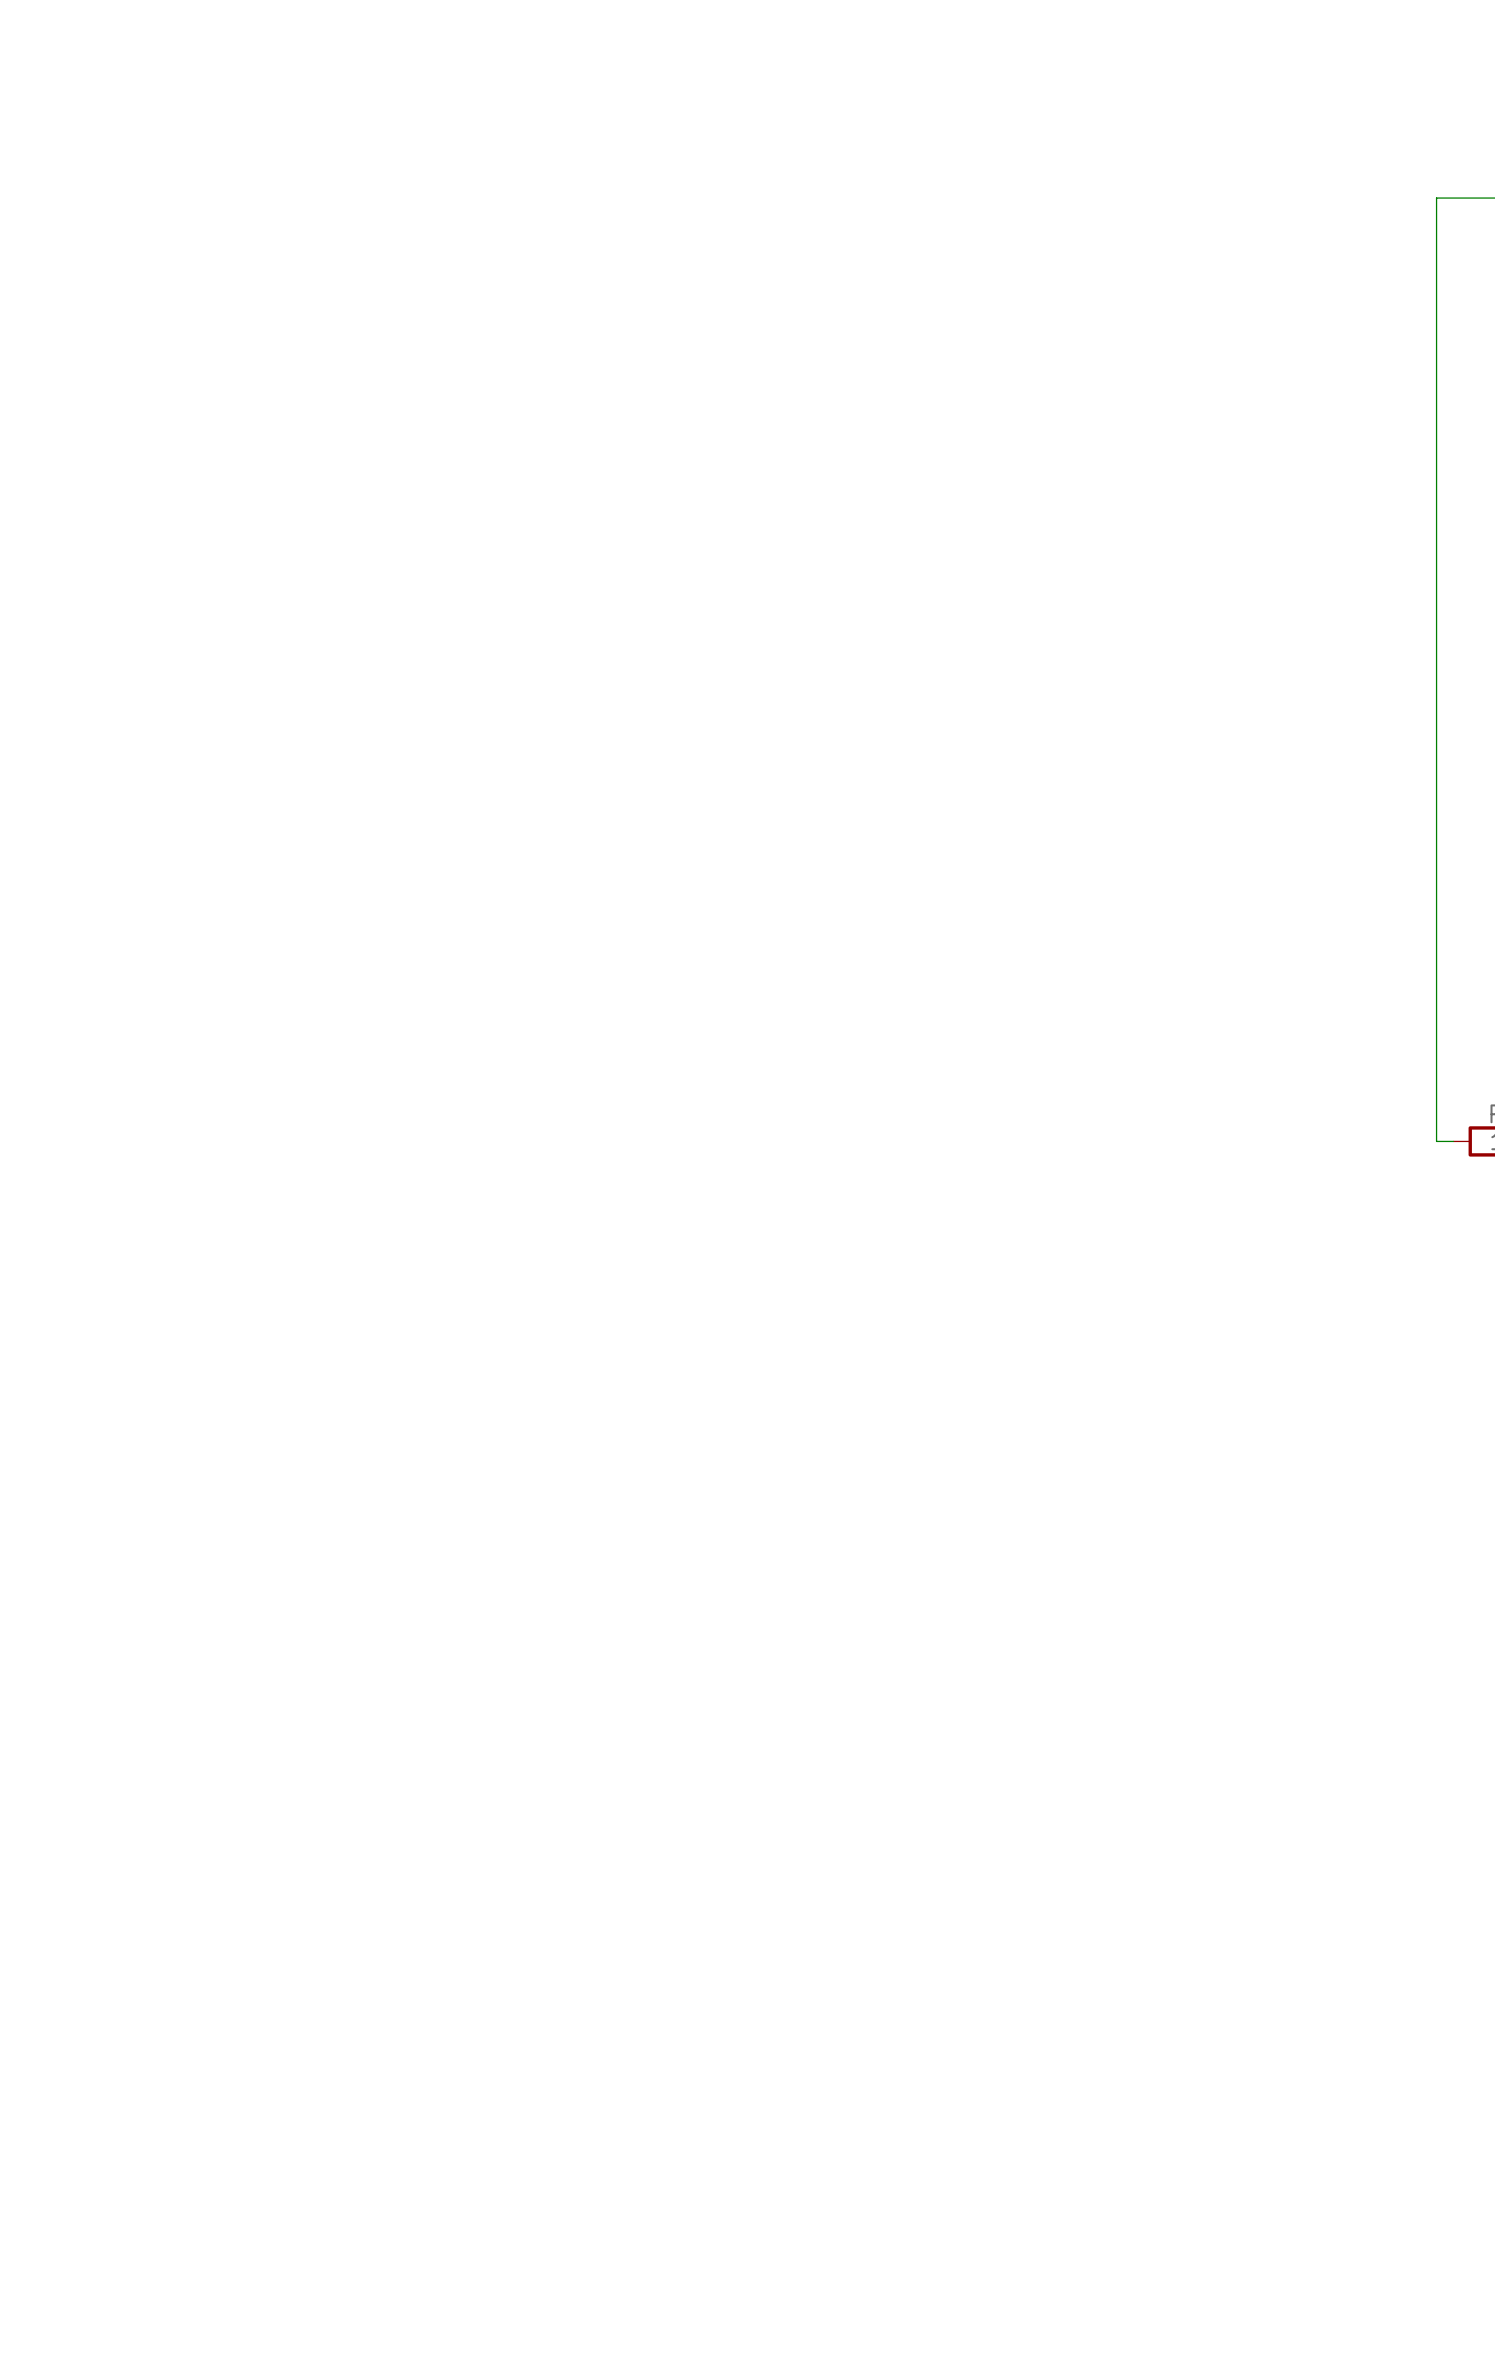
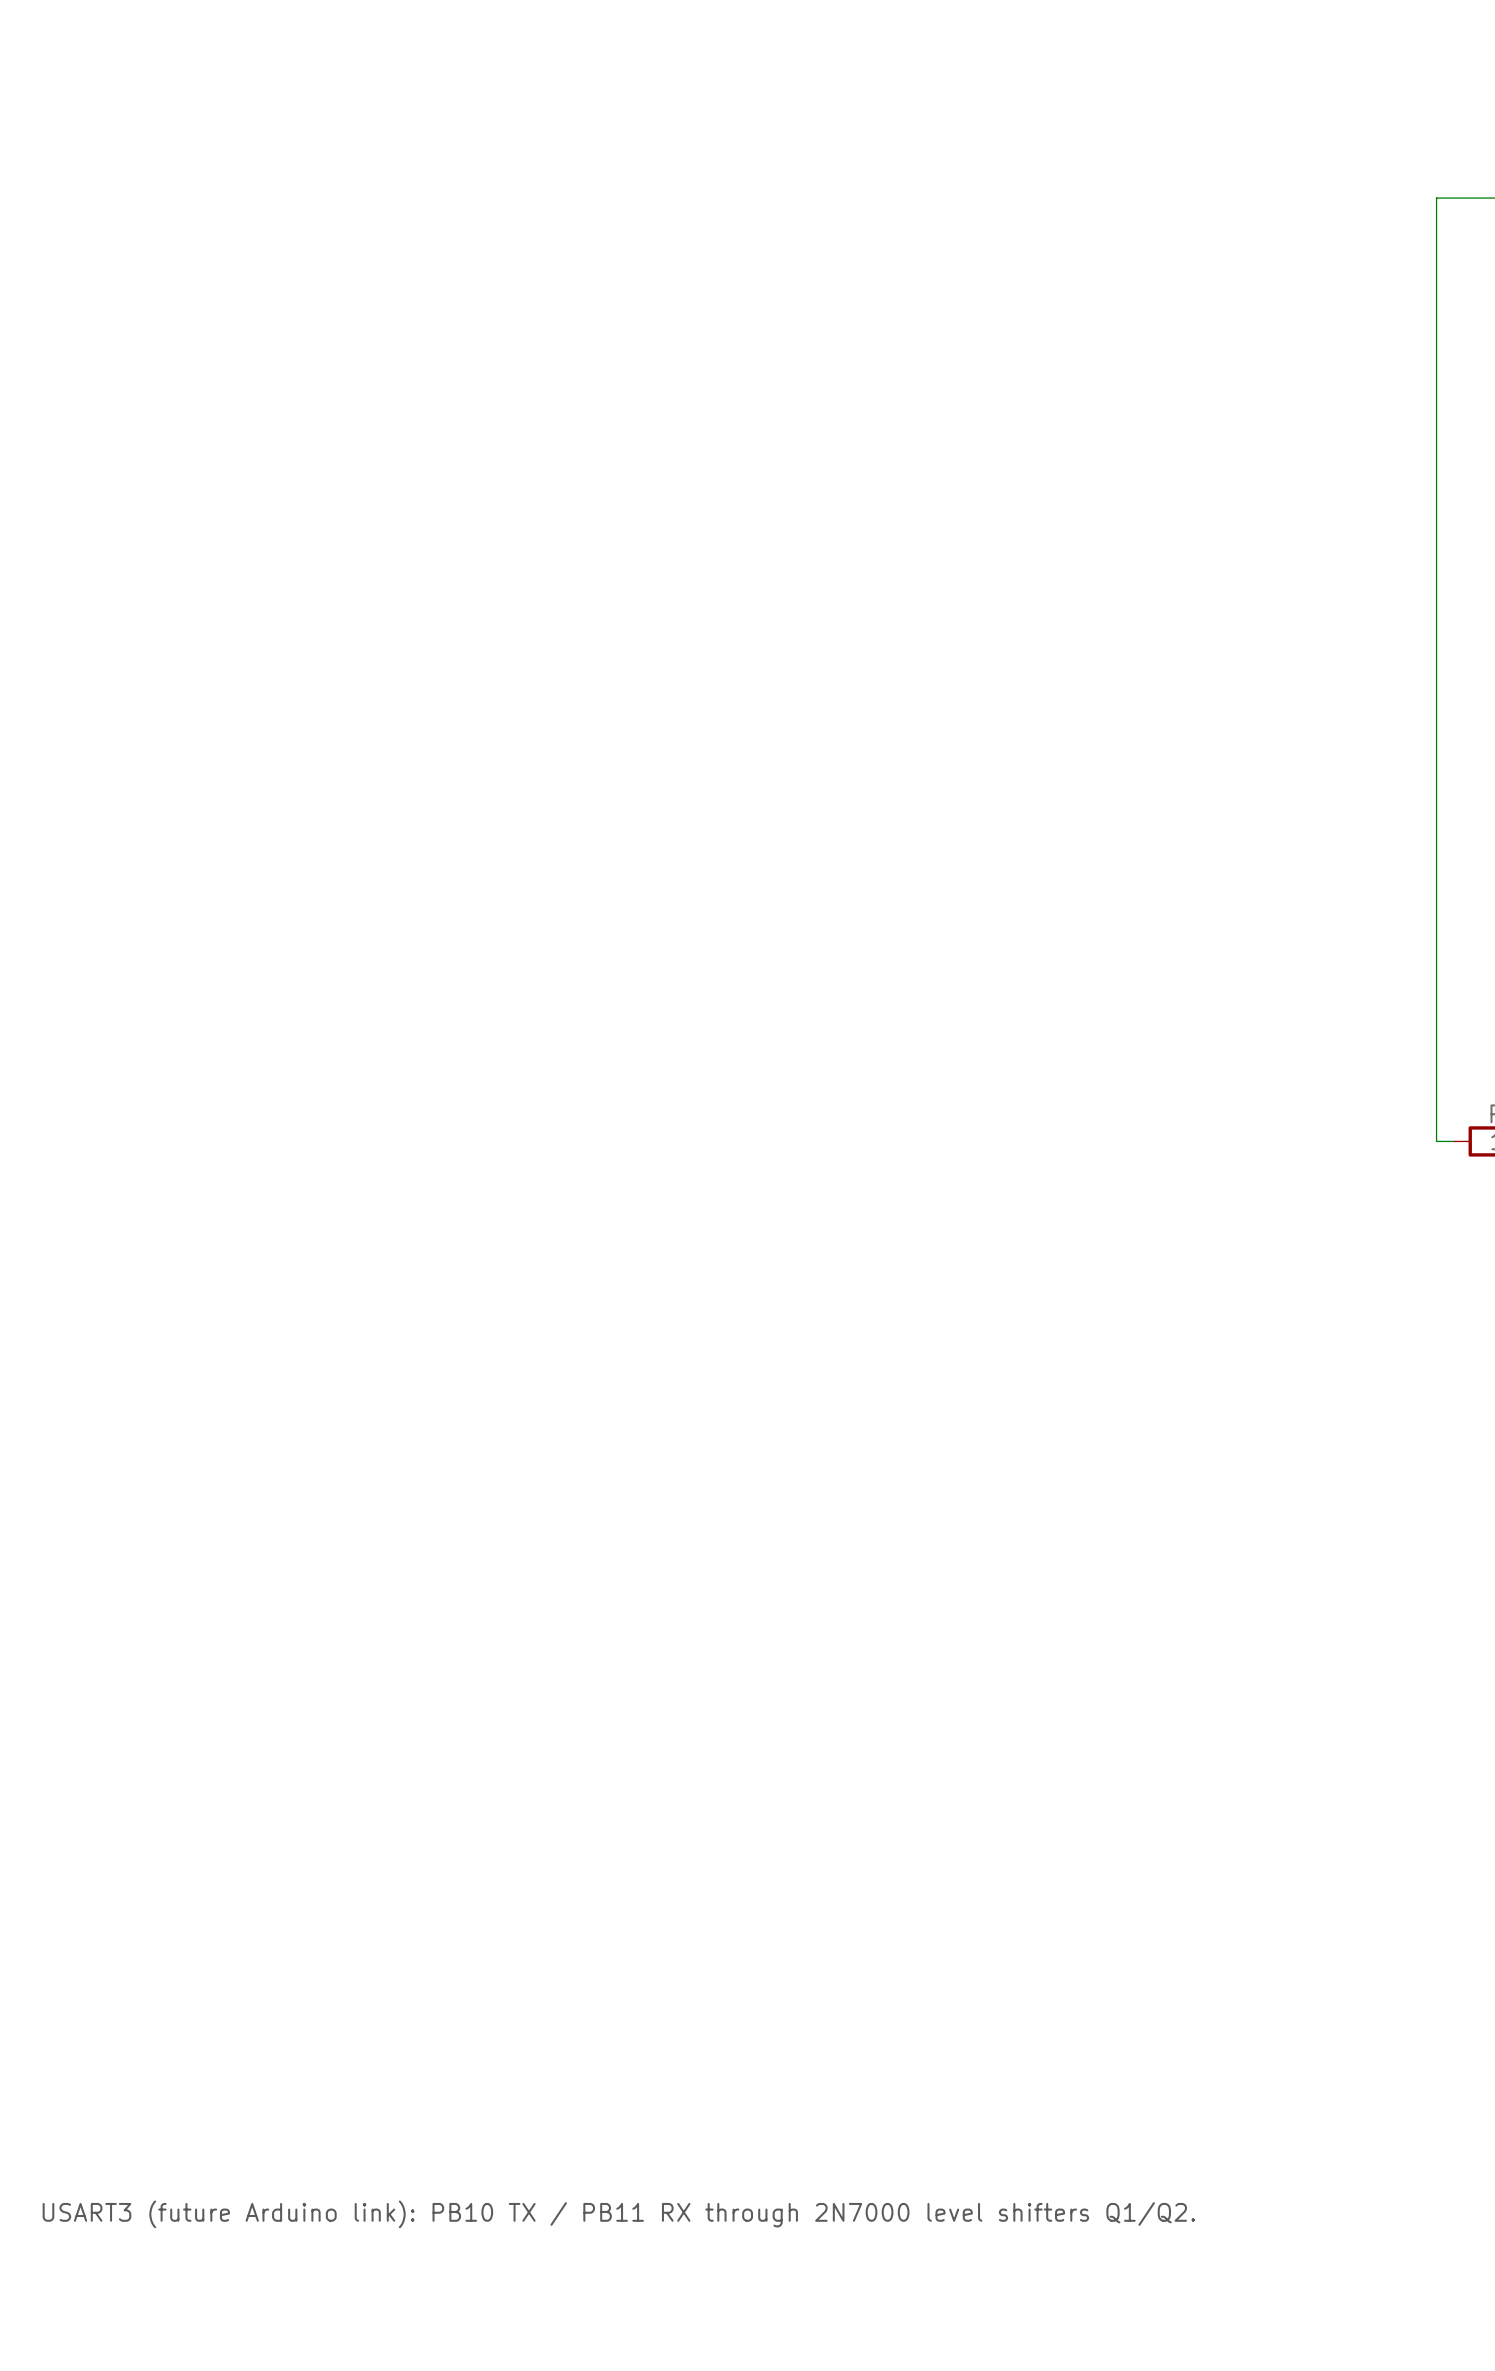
text: none -> USART3 (future Arduino link): PB10 TX / PB11 RX through 2N7000 level shifters Q1/Q2. (618, 2214)

